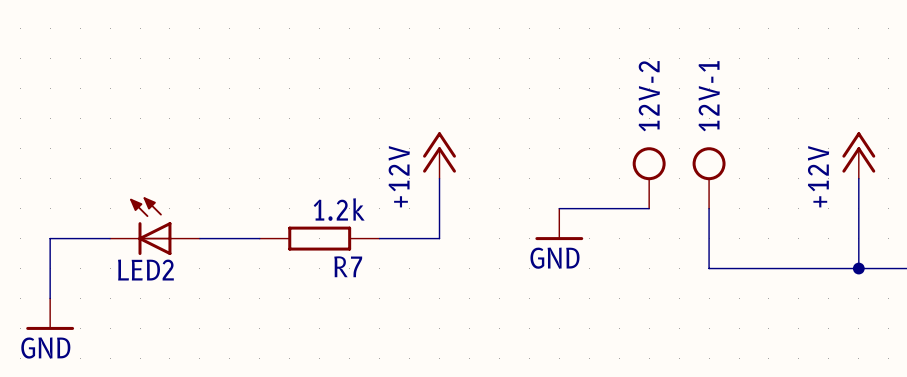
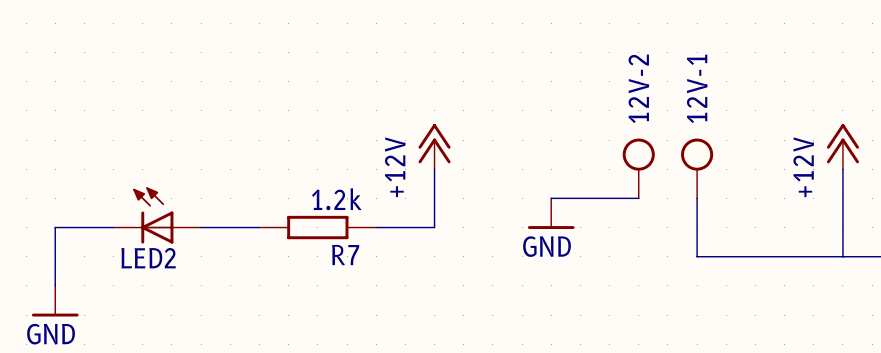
junction: (858, 268) -> none

